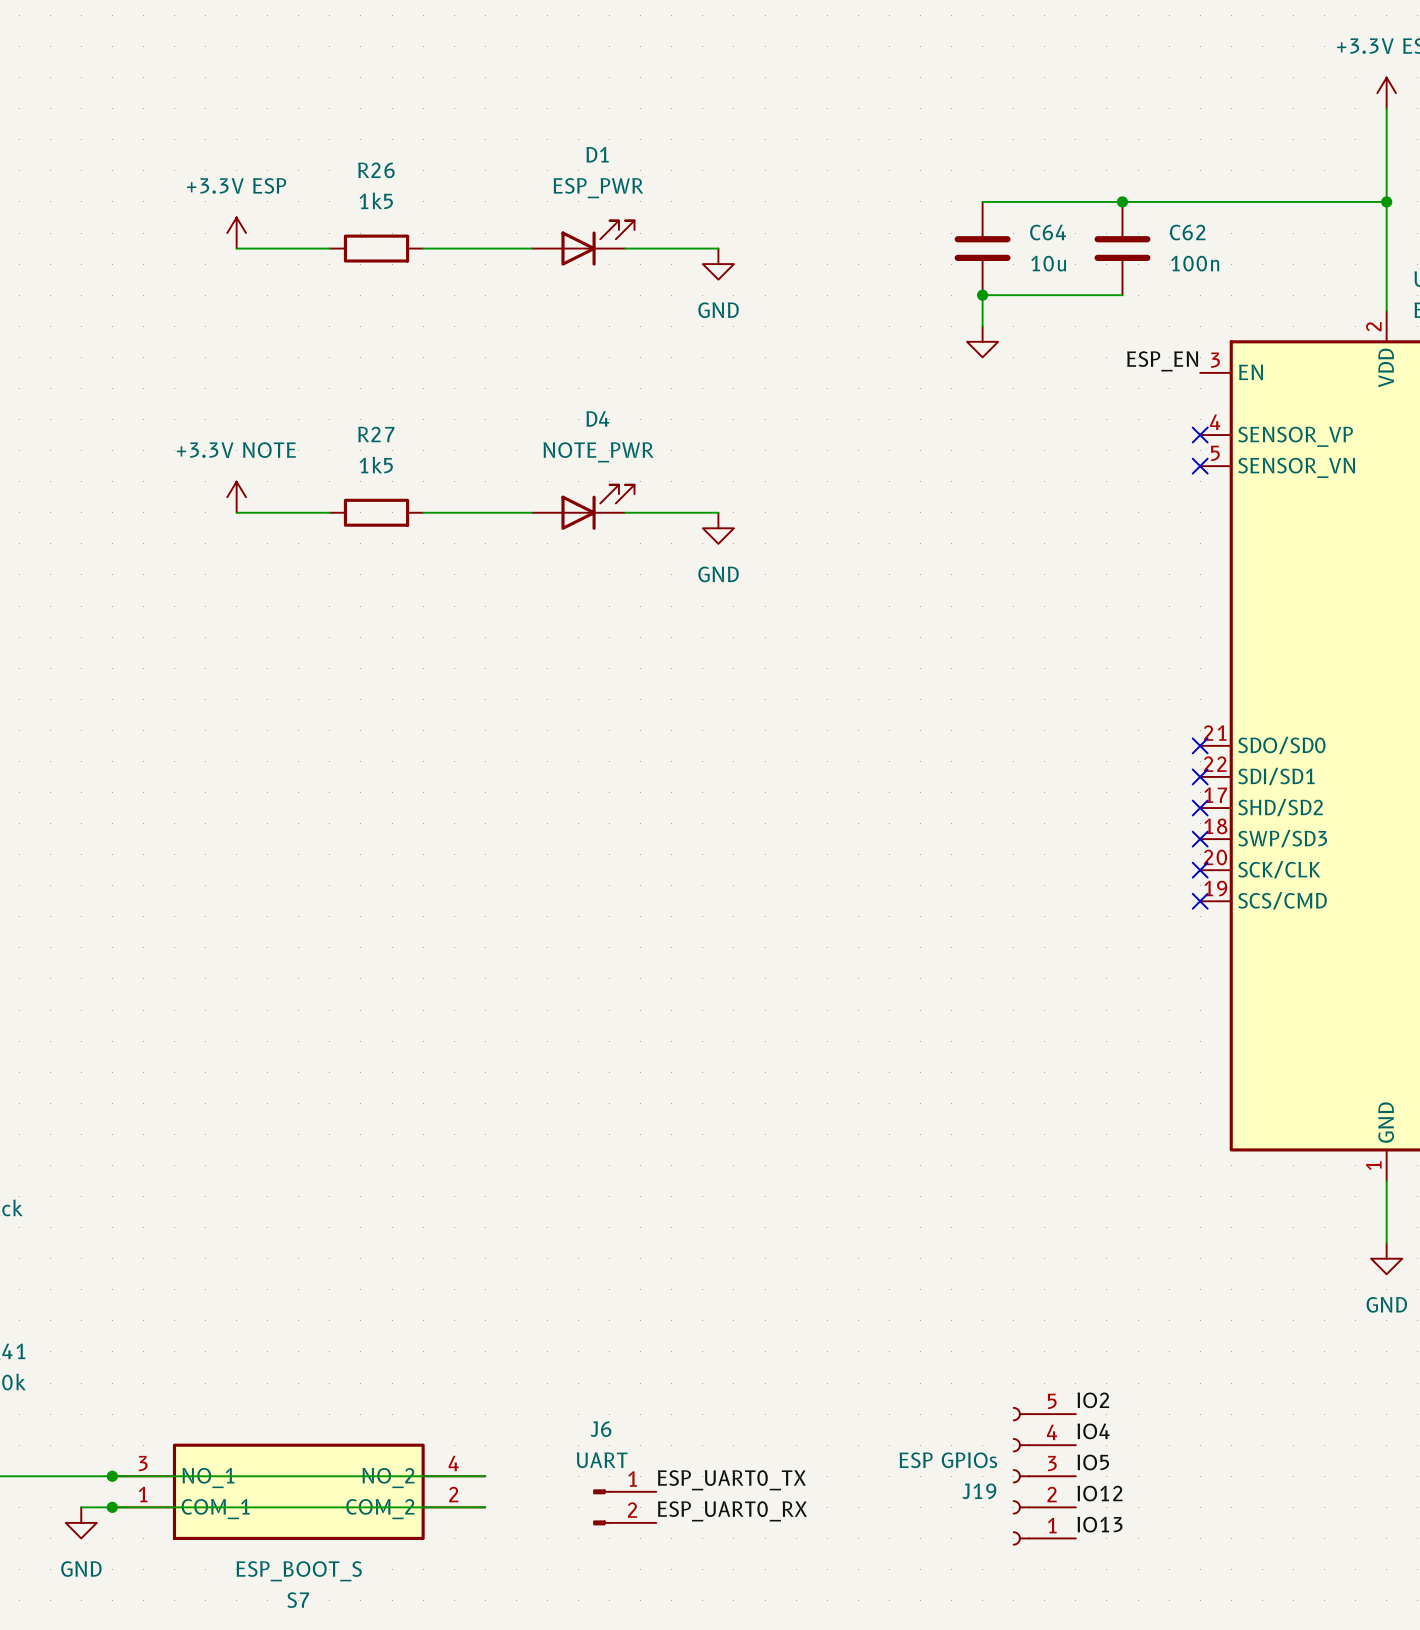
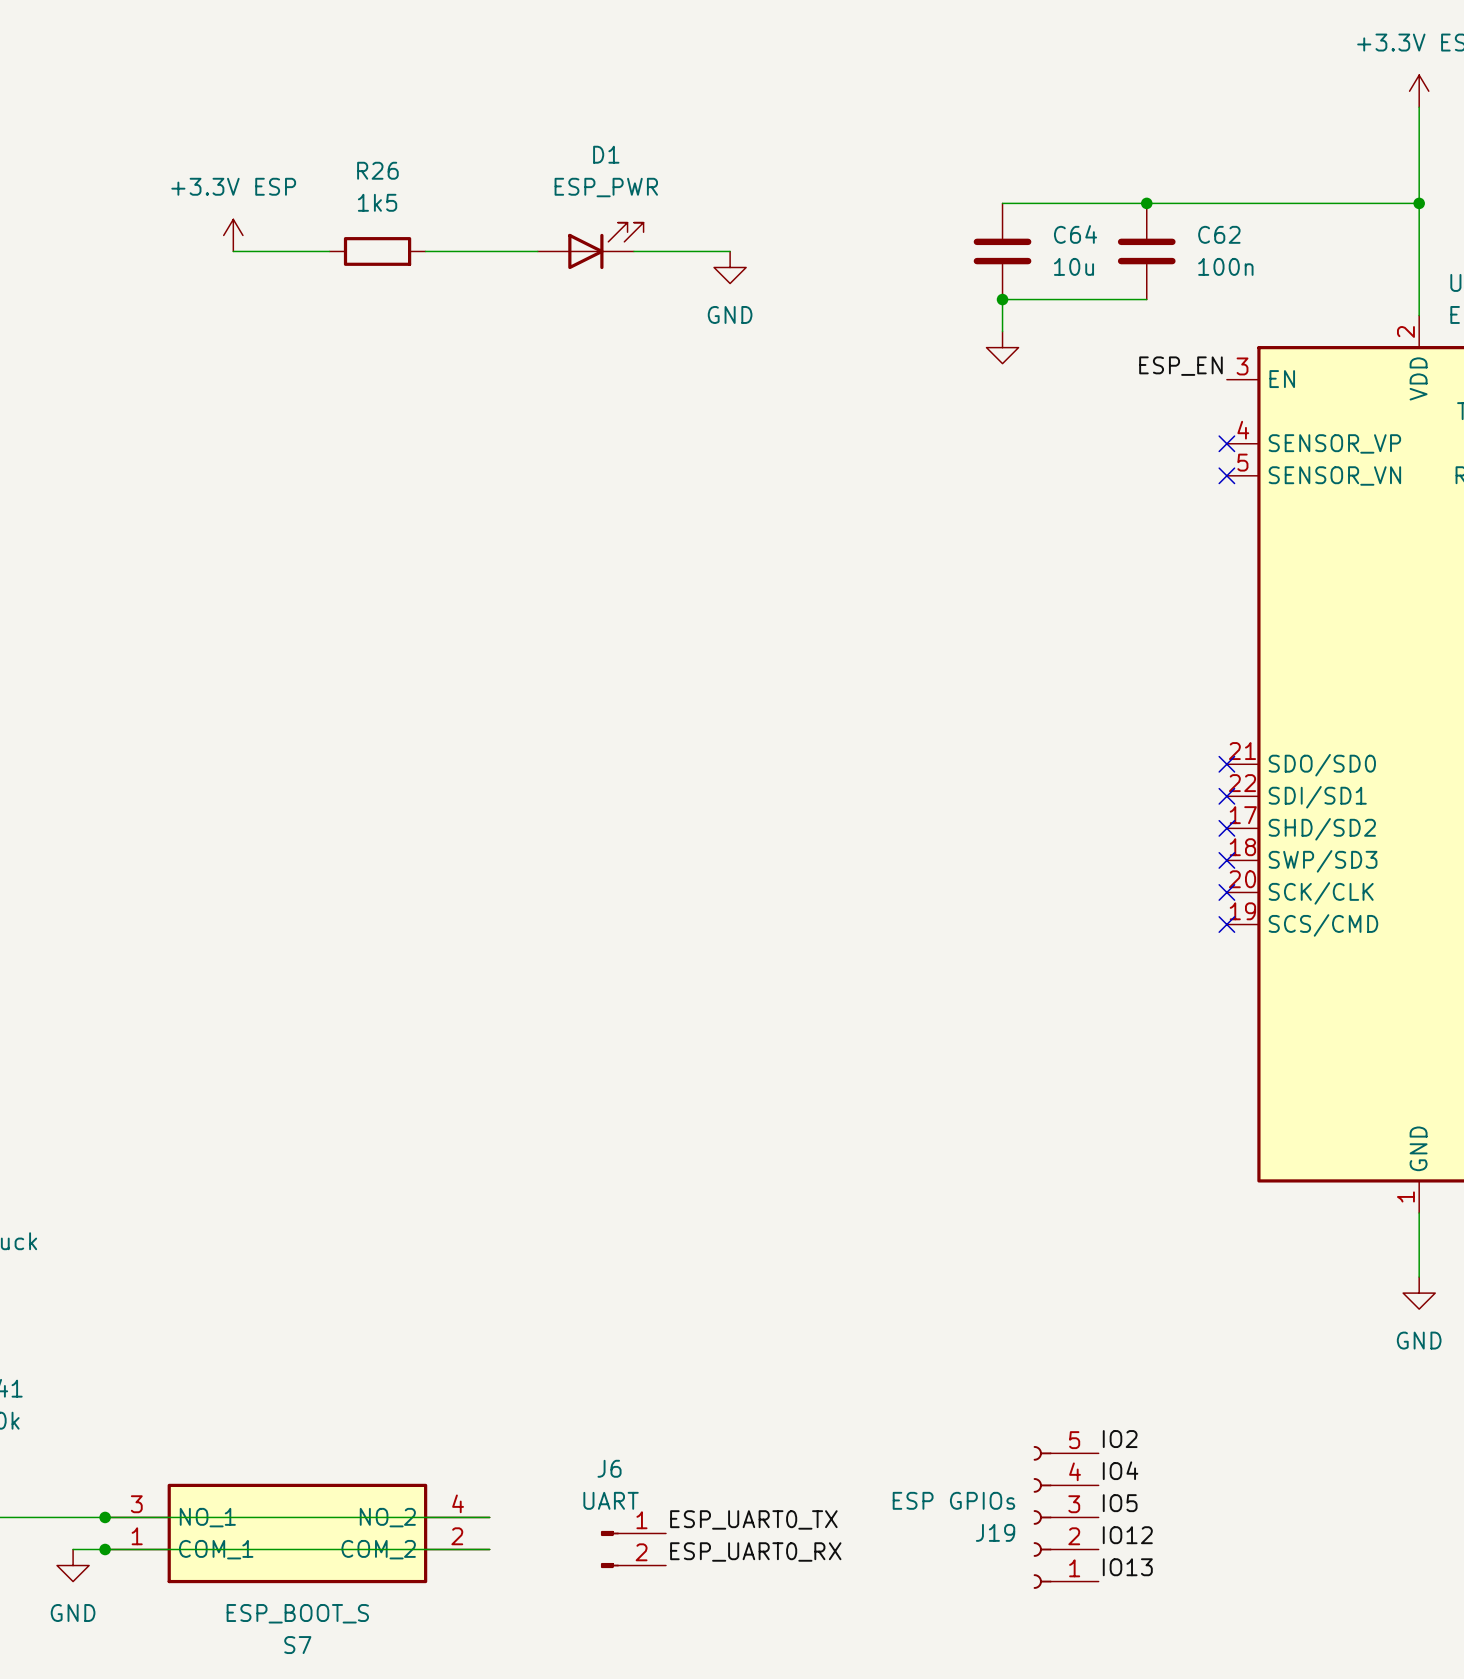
power symbol: +3.3V NOTE (236, 497) -> none
D4: NOTE_PWR (583, 507) -> none
wire: (236, 512) (329, 512) -> none
R27: 1k5 (376, 512) -> none
wire: (423, 512) (531, 512) -> none
wire: (625, 512) (718, 512) -> none
power symbol: GND (718, 528) -> none

